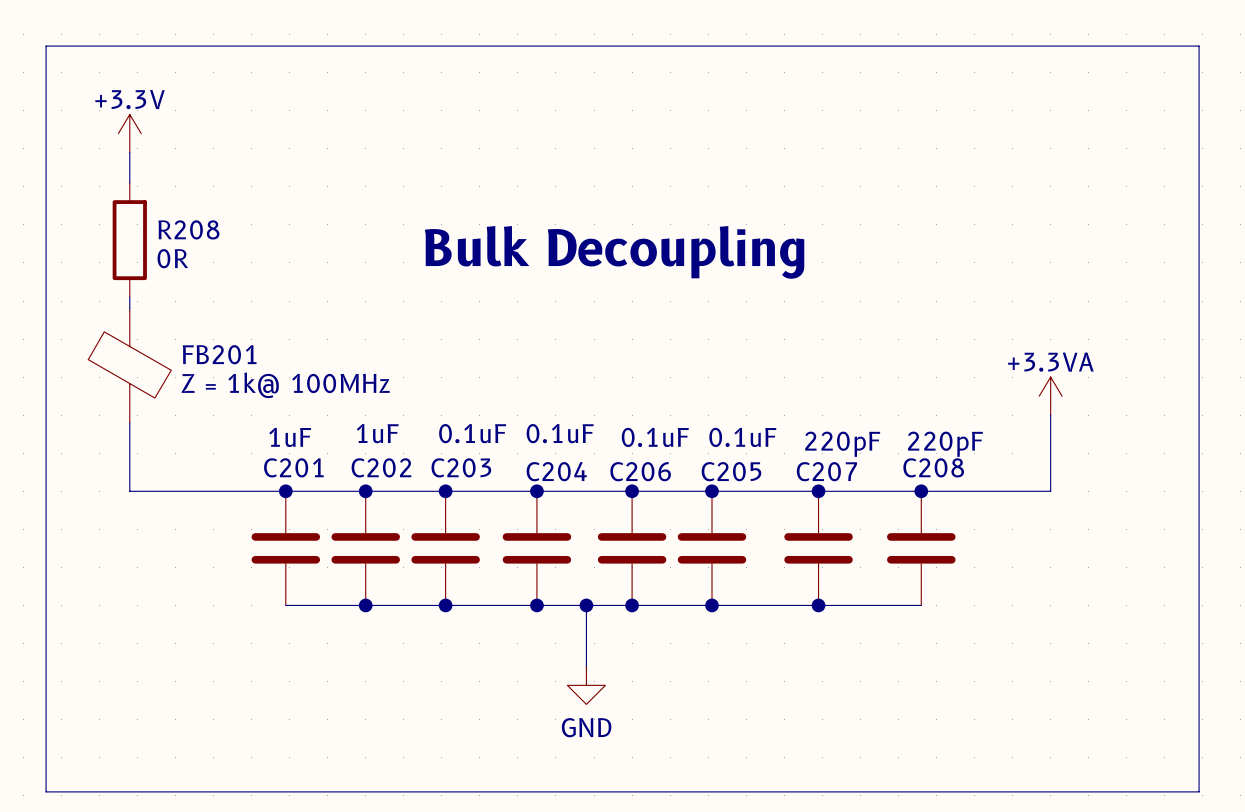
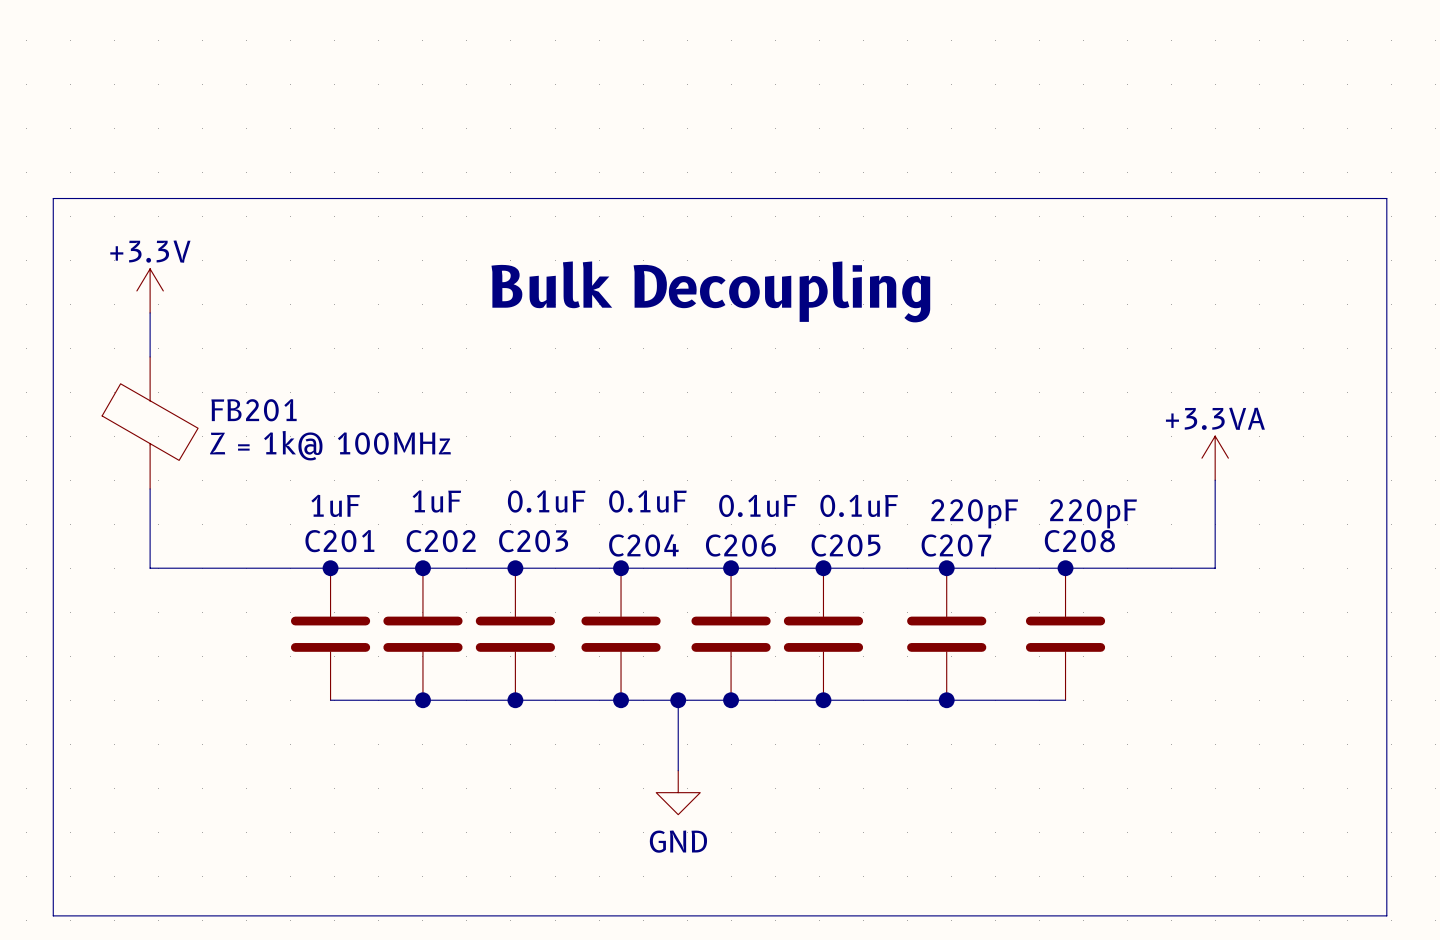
power symbol position: +3.3V (129, 133) -> +3.3V (150, 290)
wire: (129, 152) (129, 183) -> none
line: (46, 171) (46, 46) (1199, 46) (1199, 171) -> (53, 198) (1386, 198)
R208: 0R (129, 240) -> none

